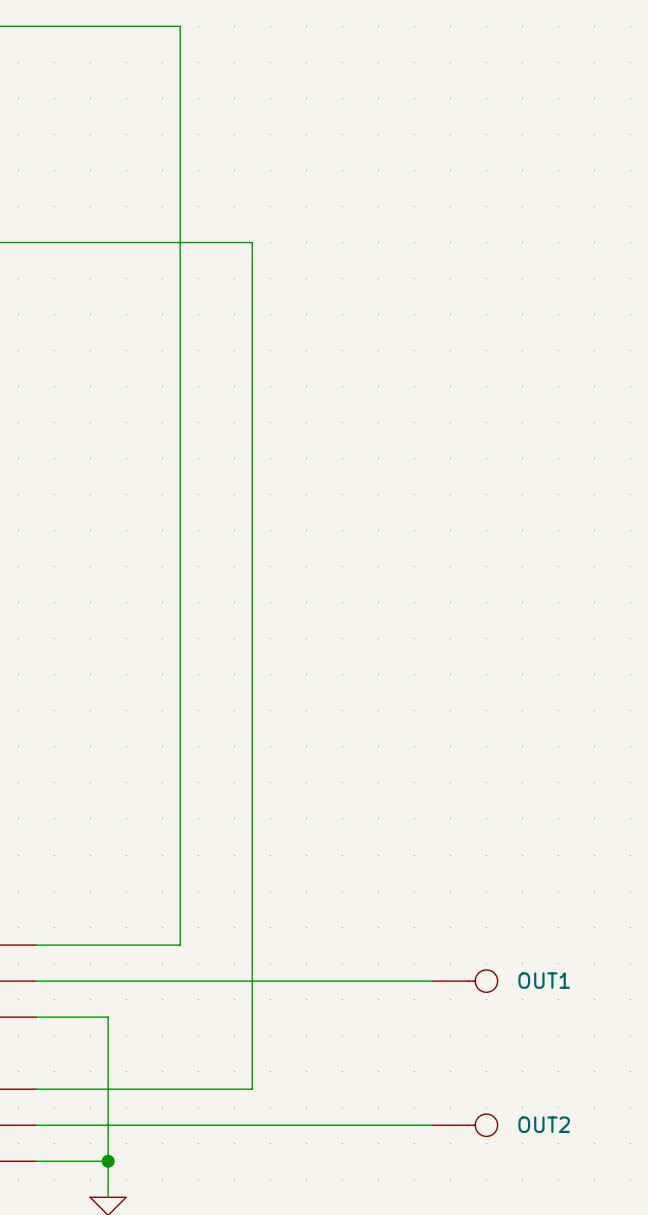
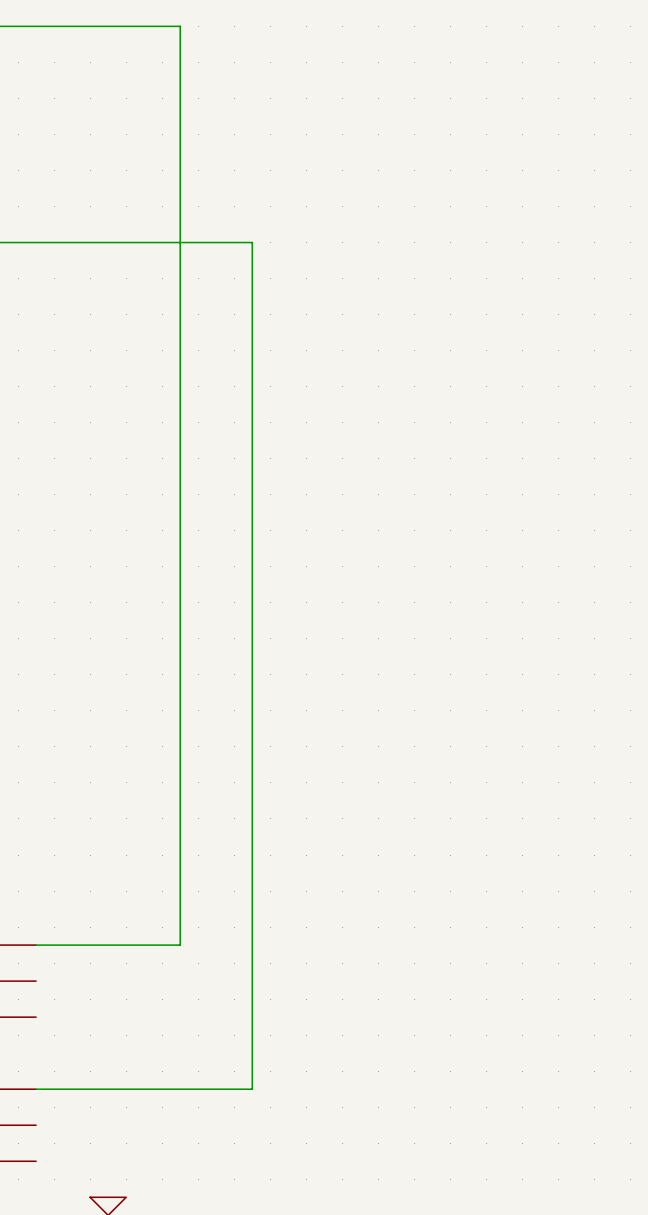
wire: (36, 981) (432, 981) -> none
OUT1: (465, 981) -> none
wire: (36, 1017) (108, 1017) (108, 1197) -> none
wire: (36, 1125) (432, 1125) -> none
OUT2: (465, 1125) -> none
wire: (36, 1161) (108, 1161) -> none
junction: (108, 1161) -> none

